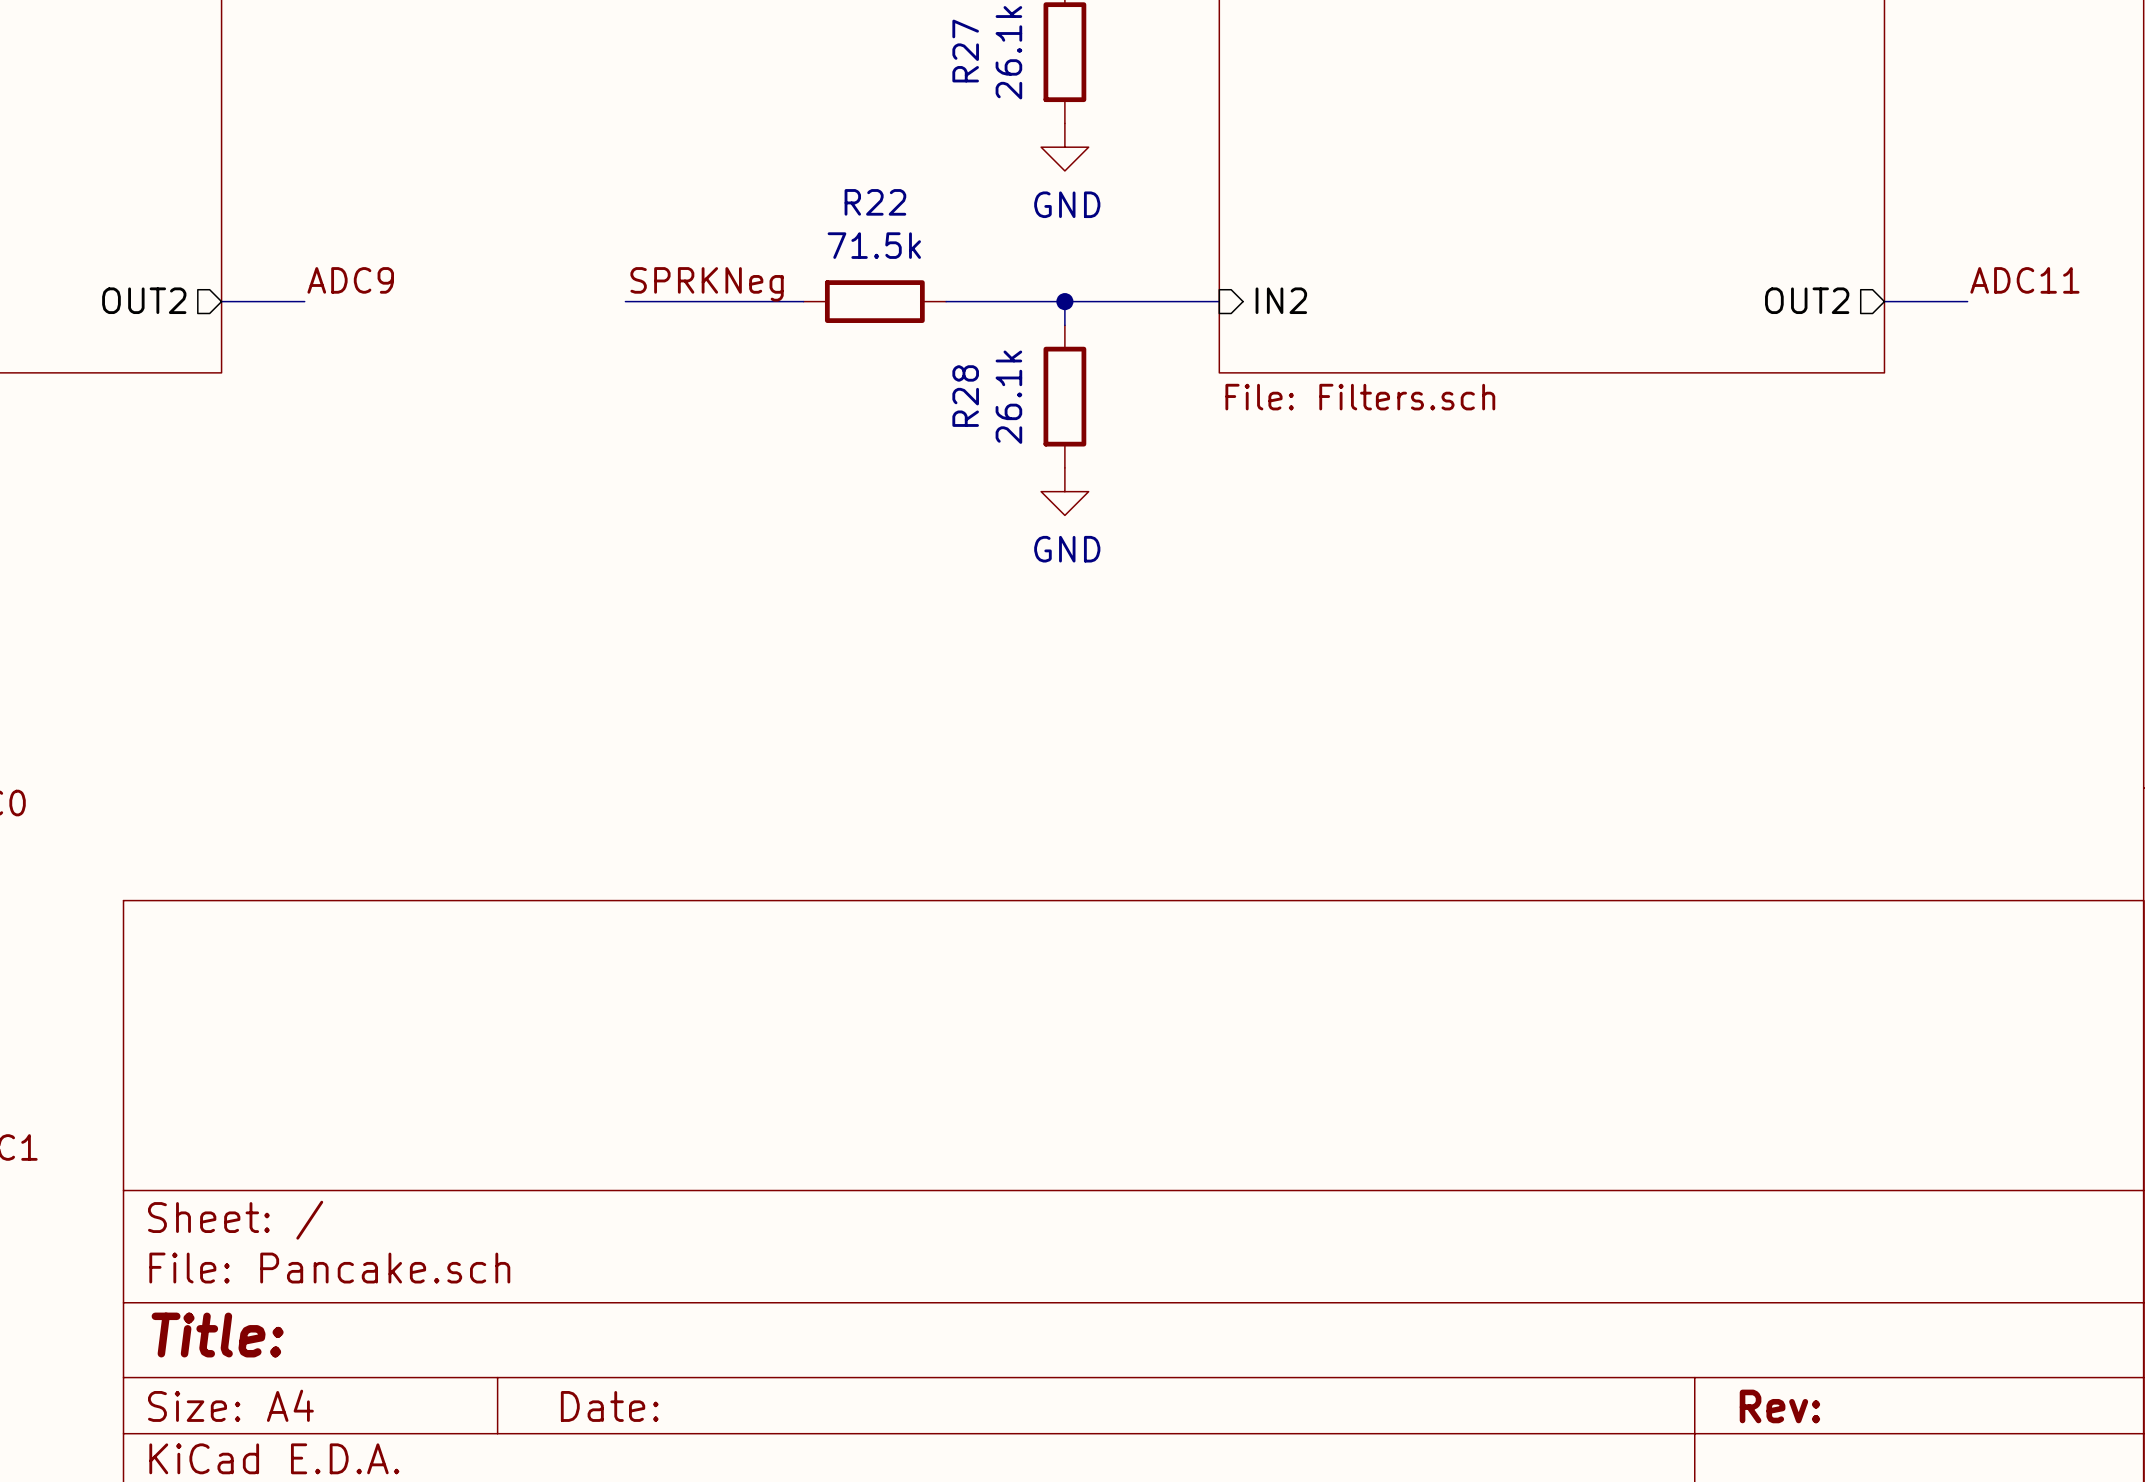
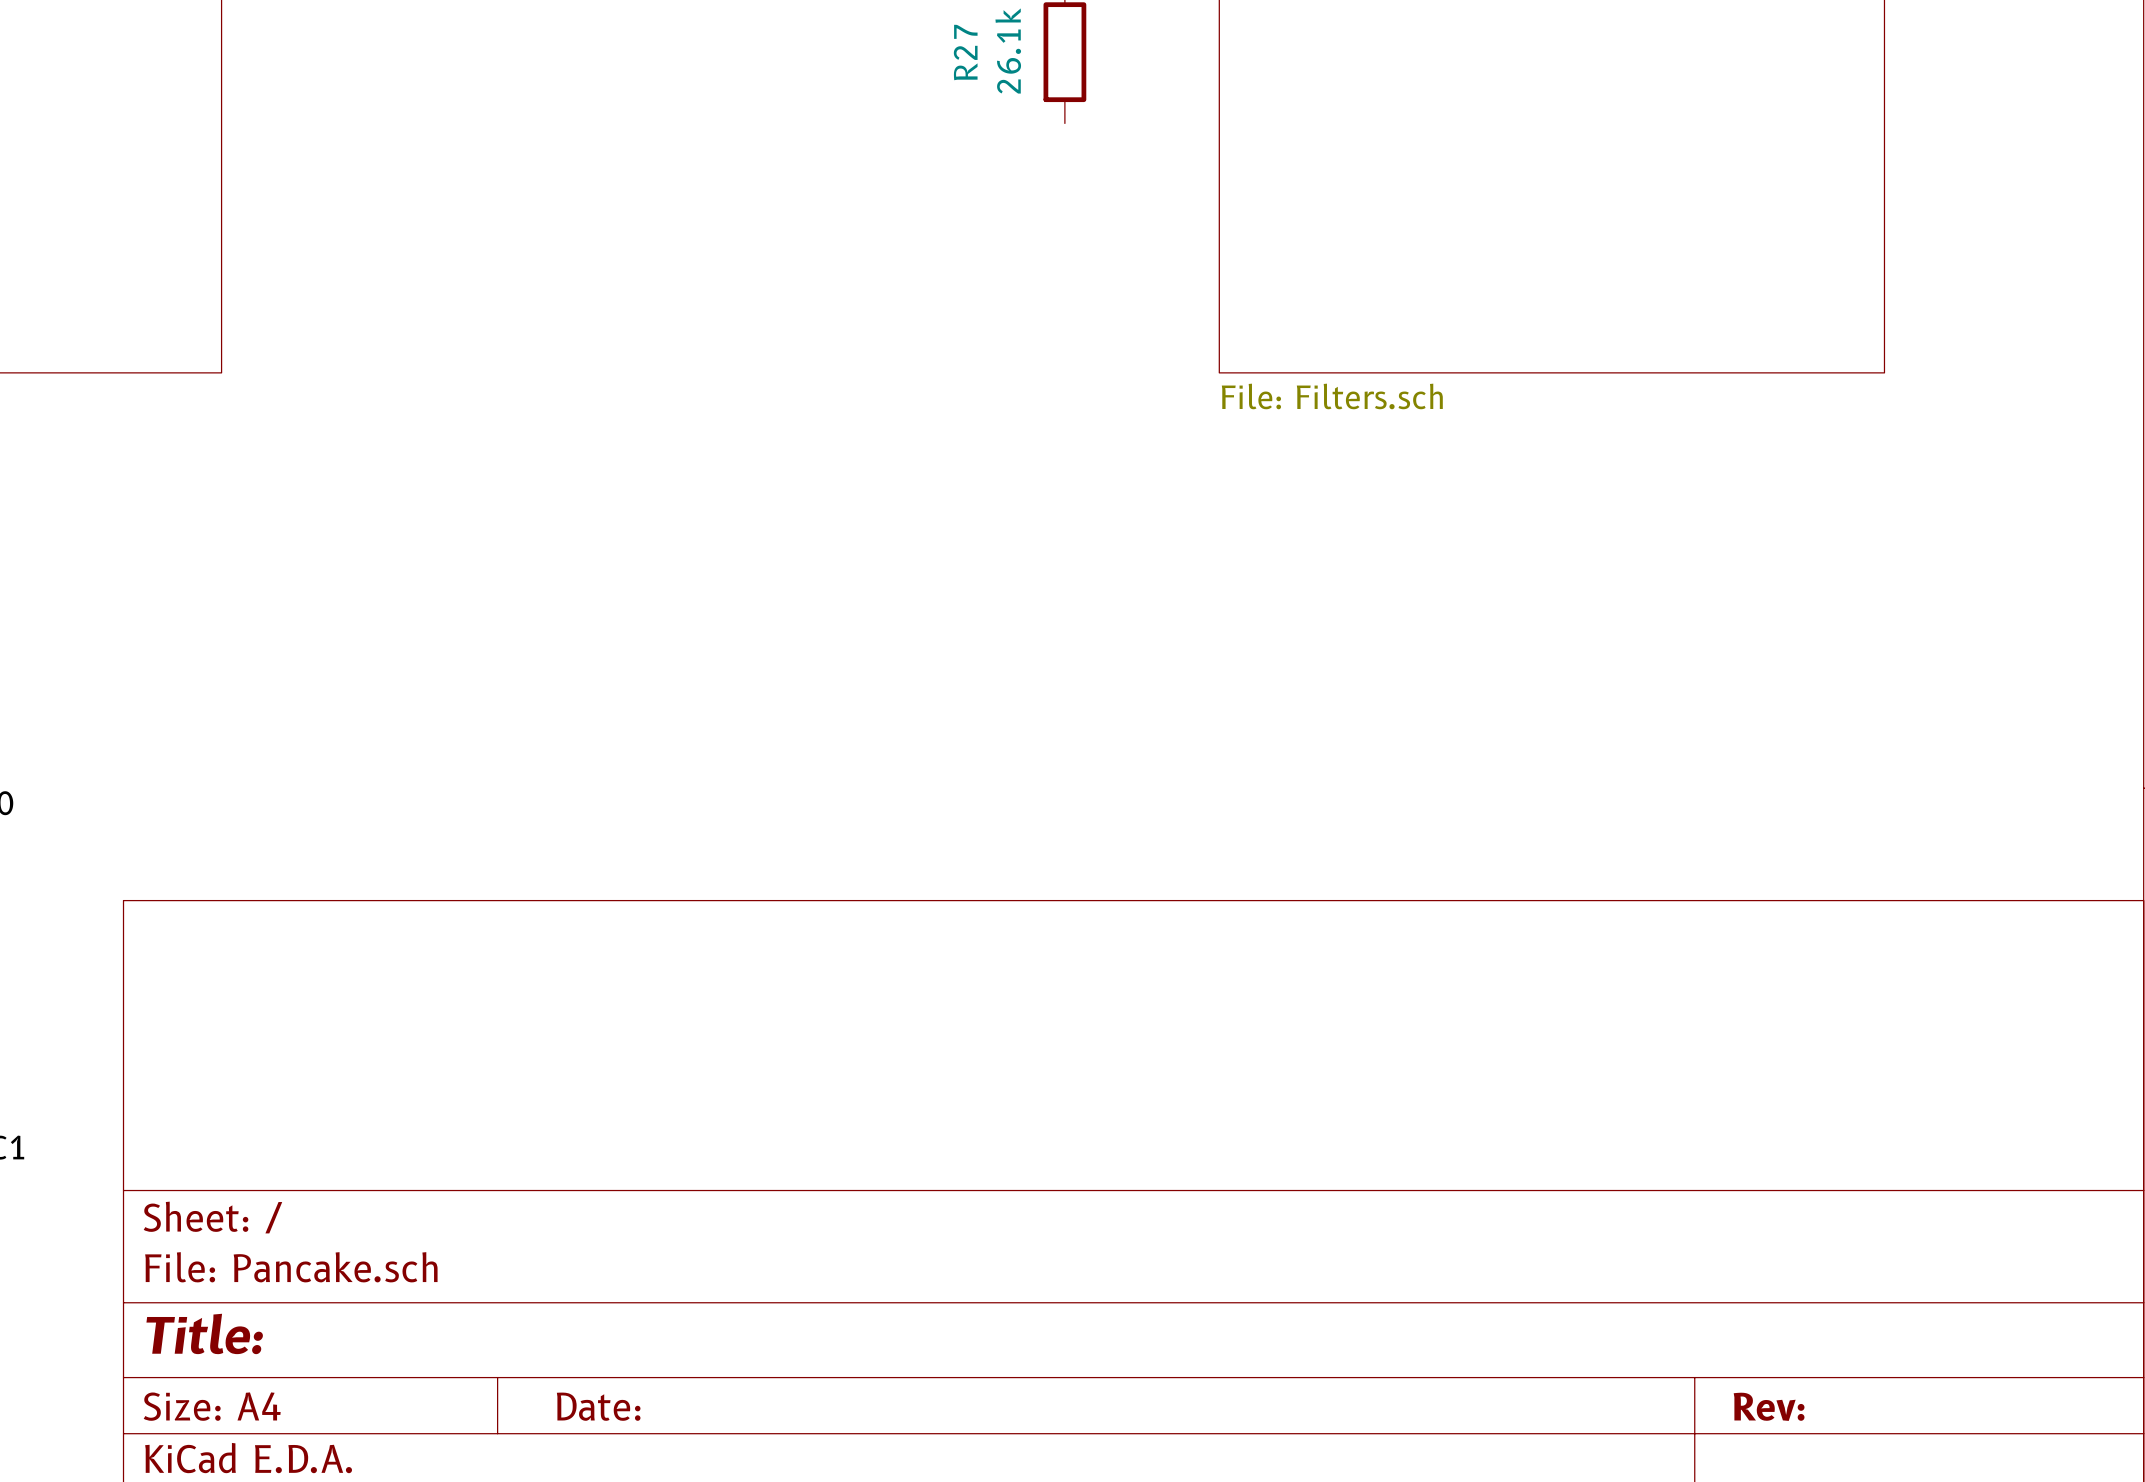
power symbol: GND (1064, 147) -> none
label: ADC9 (350, 280) -> none
label: ADC11 (2024, 280) -> none
label: SPRKNeg (707, 284) -> none
sheet pin: OUT2 (144, 300) -> none
sheet pin: IN2 (1281, 300) -> none
sheet pin: OUT2 (1807, 300) -> none
wire: (221, 301) (304, 301) -> none
wire: (625, 301) (803, 301) -> none
R22: 71.5k (874, 301) -> none
wire: (946, 301) (1219, 301) -> none
wire: (1064, 301) (1064, 325) -> none
junction: (1064, 301) -> none
wire: (1884, 301) (1967, 301) -> none
R28: 26.1k (1064, 396) -> none
power symbol: GND (1064, 491) -> none

